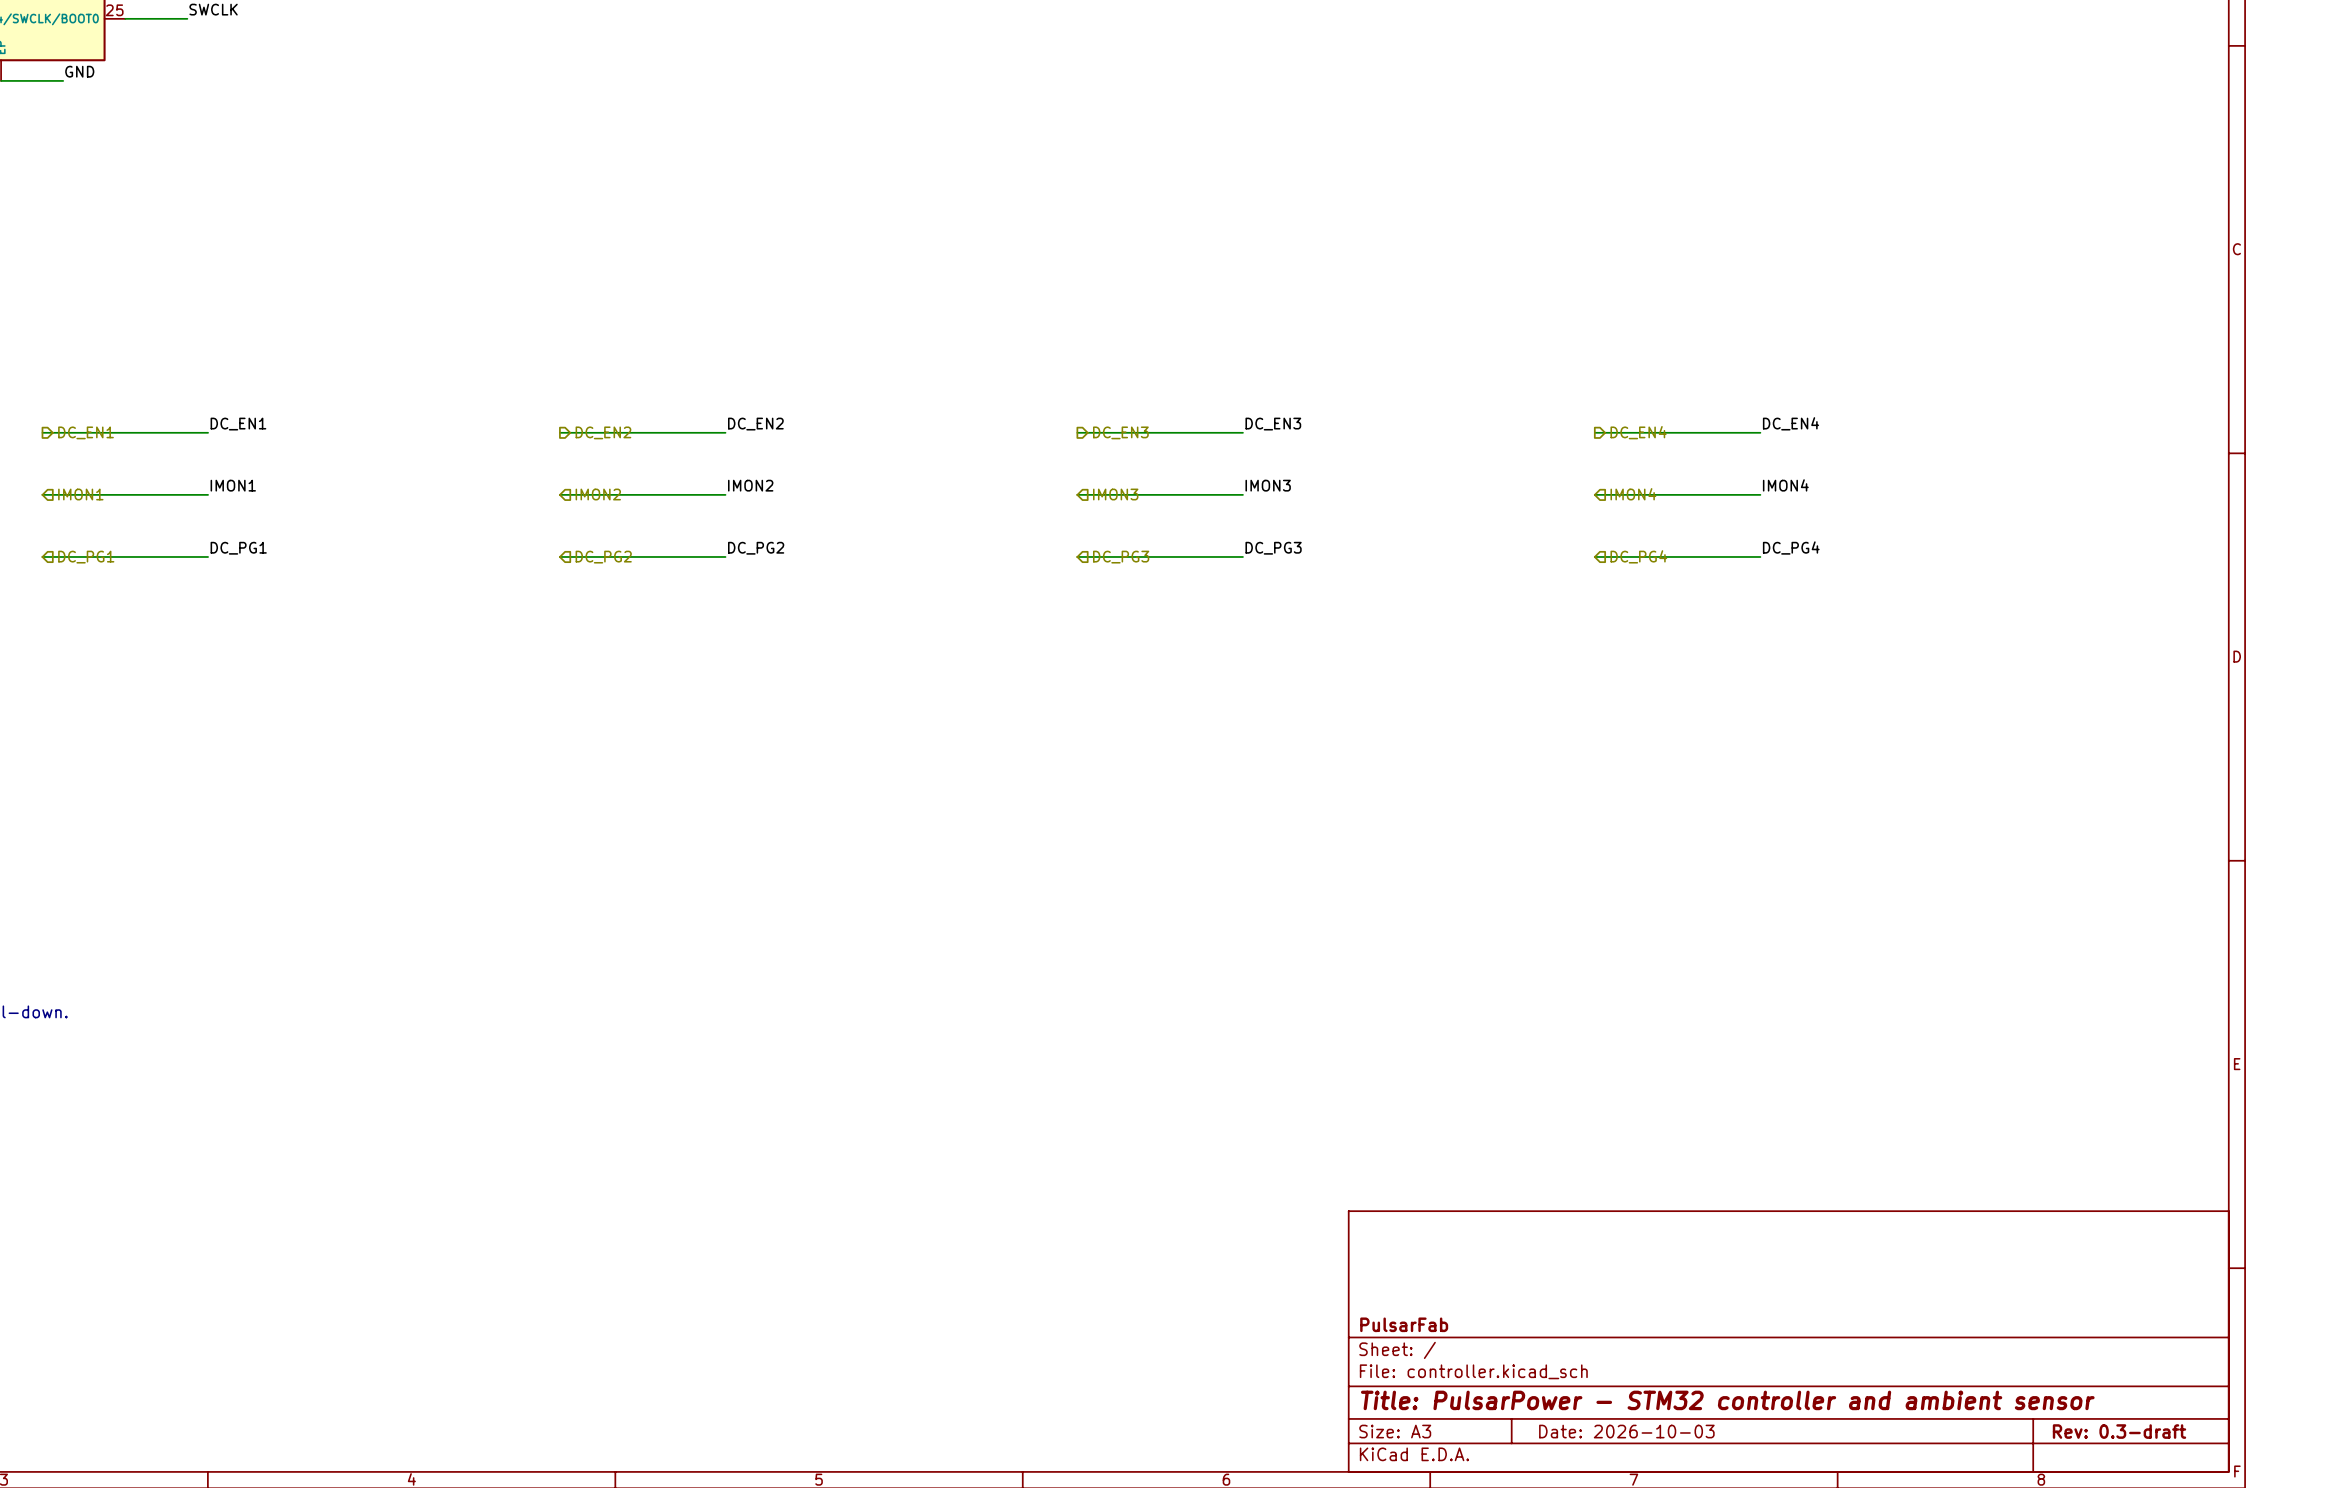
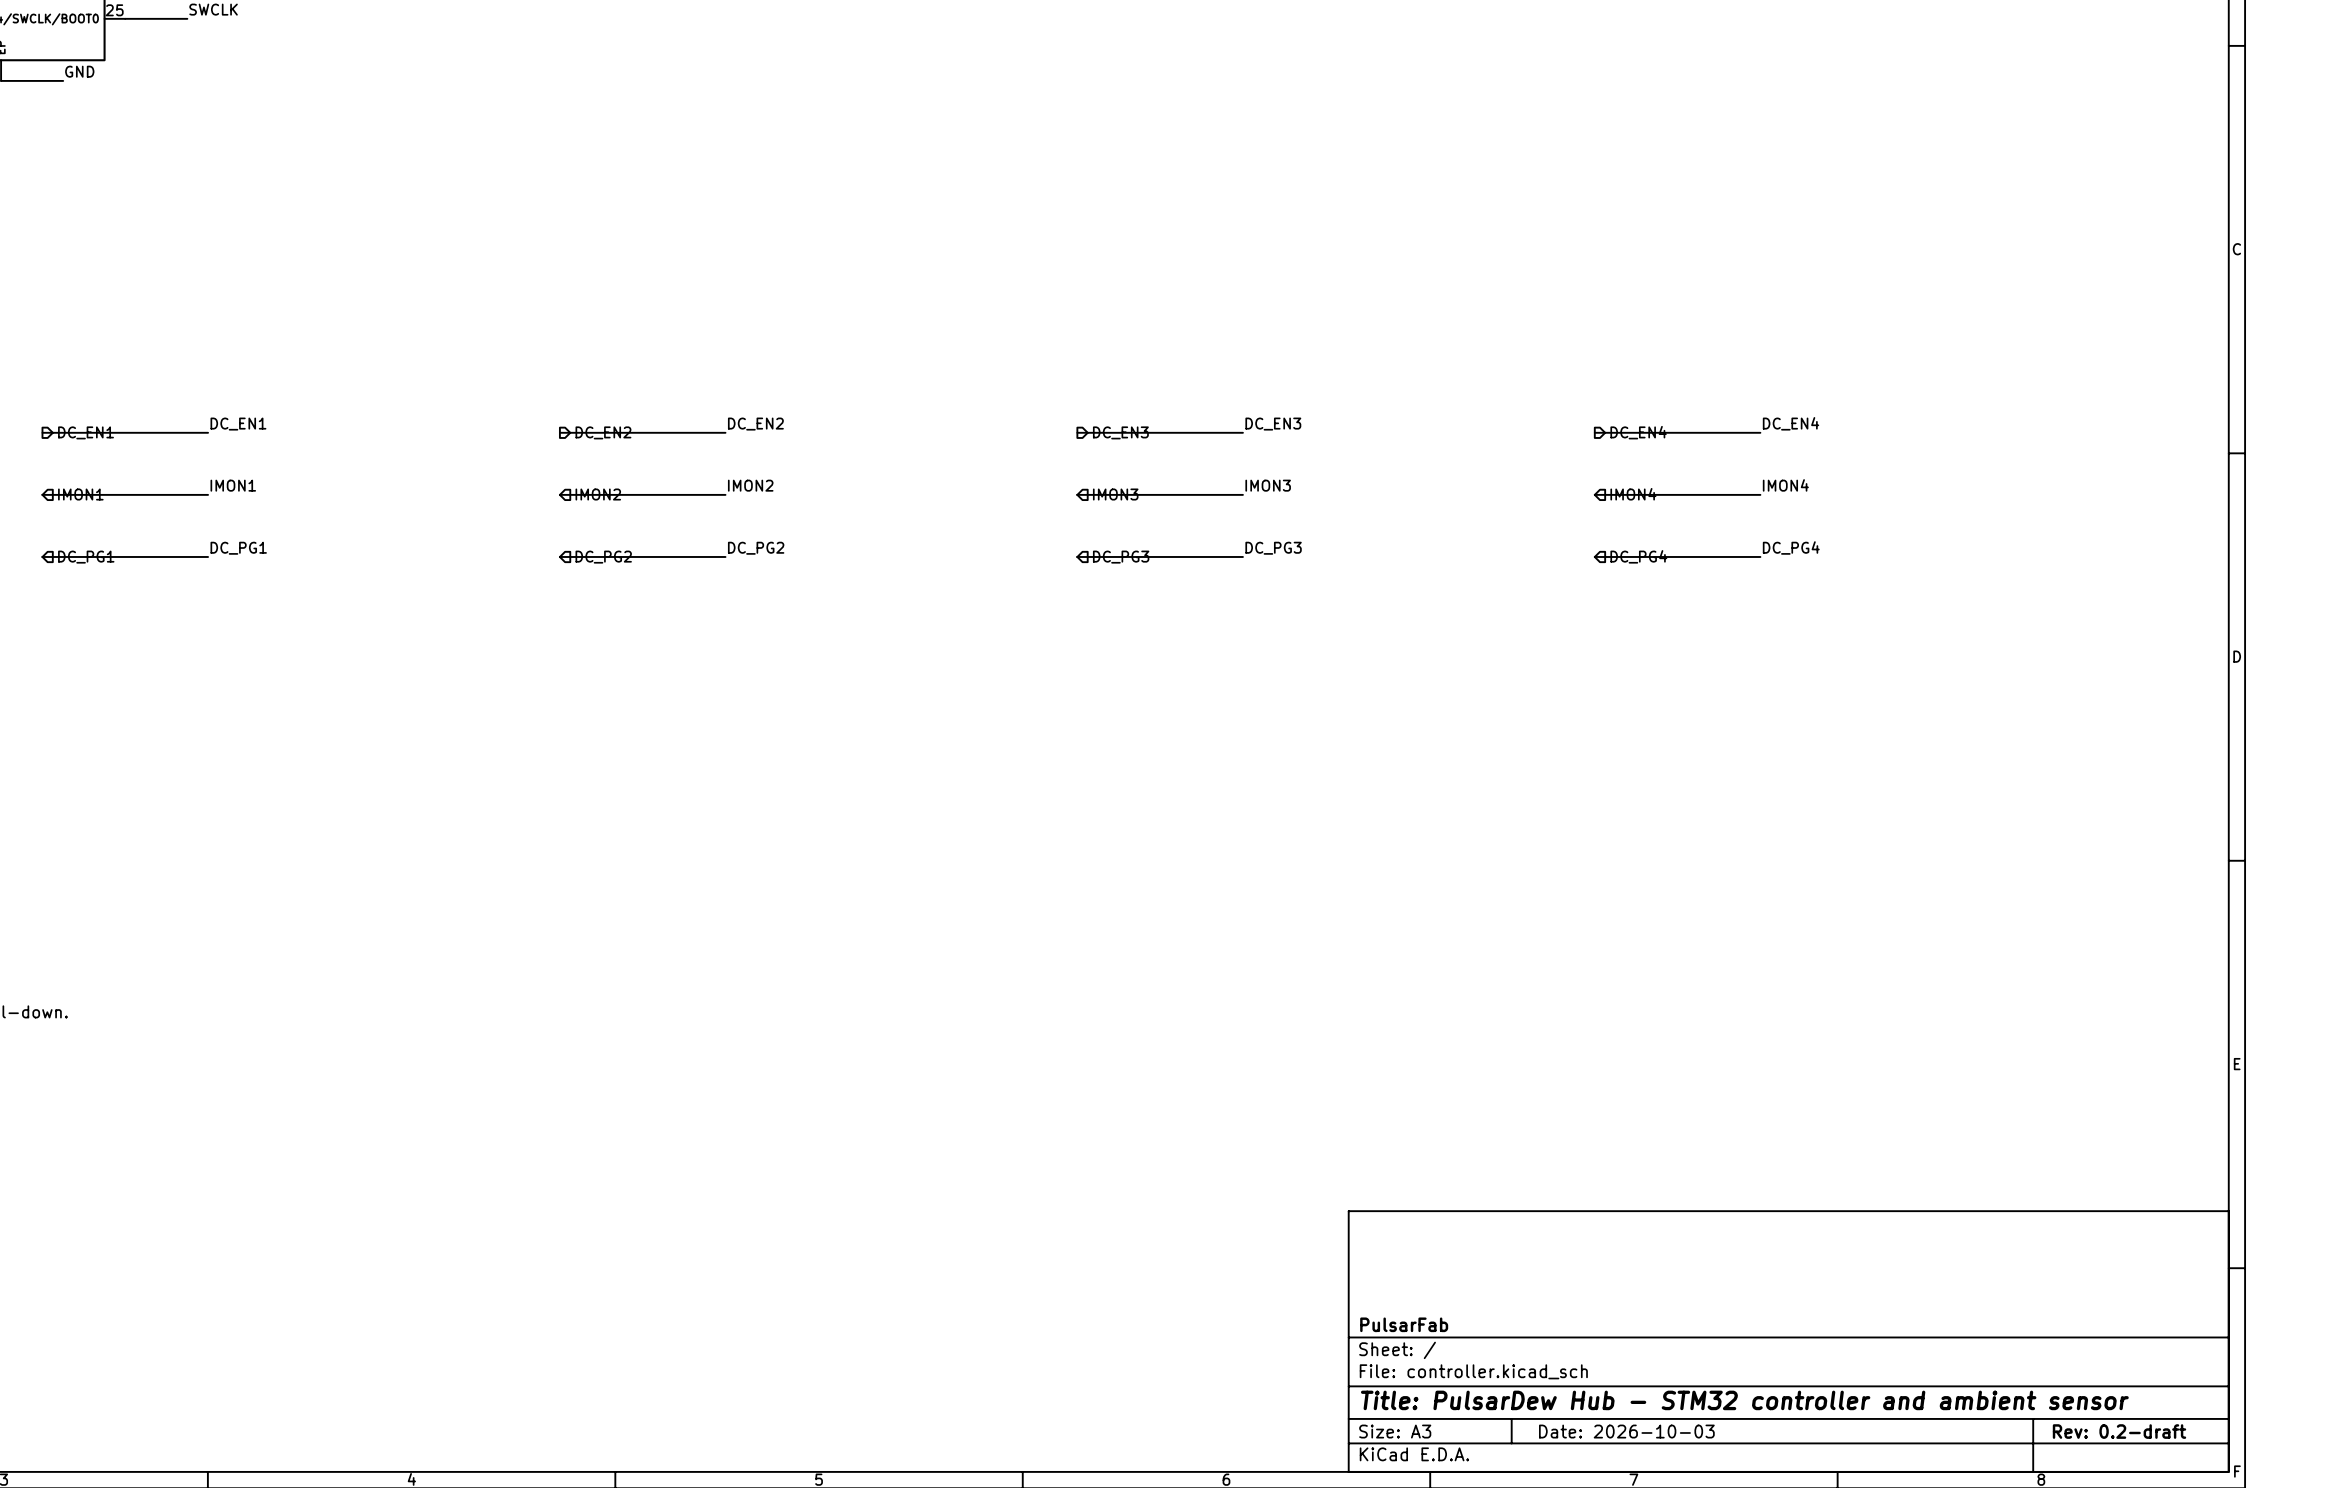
title block: Title: PulsarPower - STM32 controller and ambient sensor (1727, 1400) -> Title: PulsarDew Hub - STM32 controller and ambient sensor (1744, 1400)
title block: Rev: 0.3-draft (2119, 1431) -> Rev: 0.2-draft (2119, 1431)

